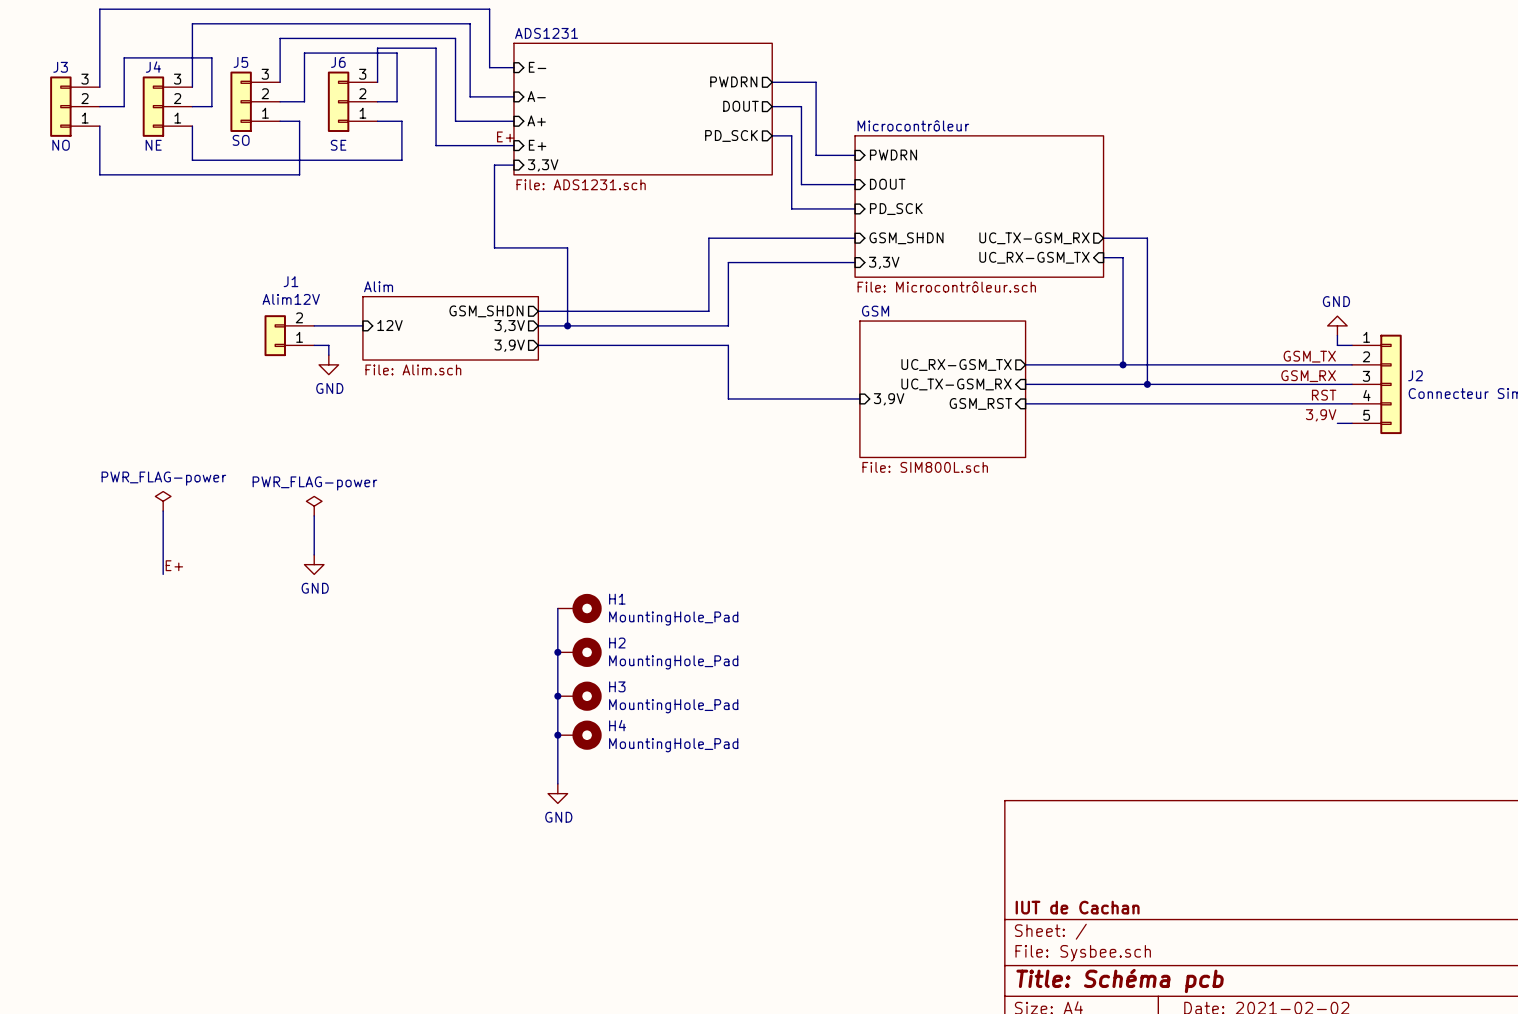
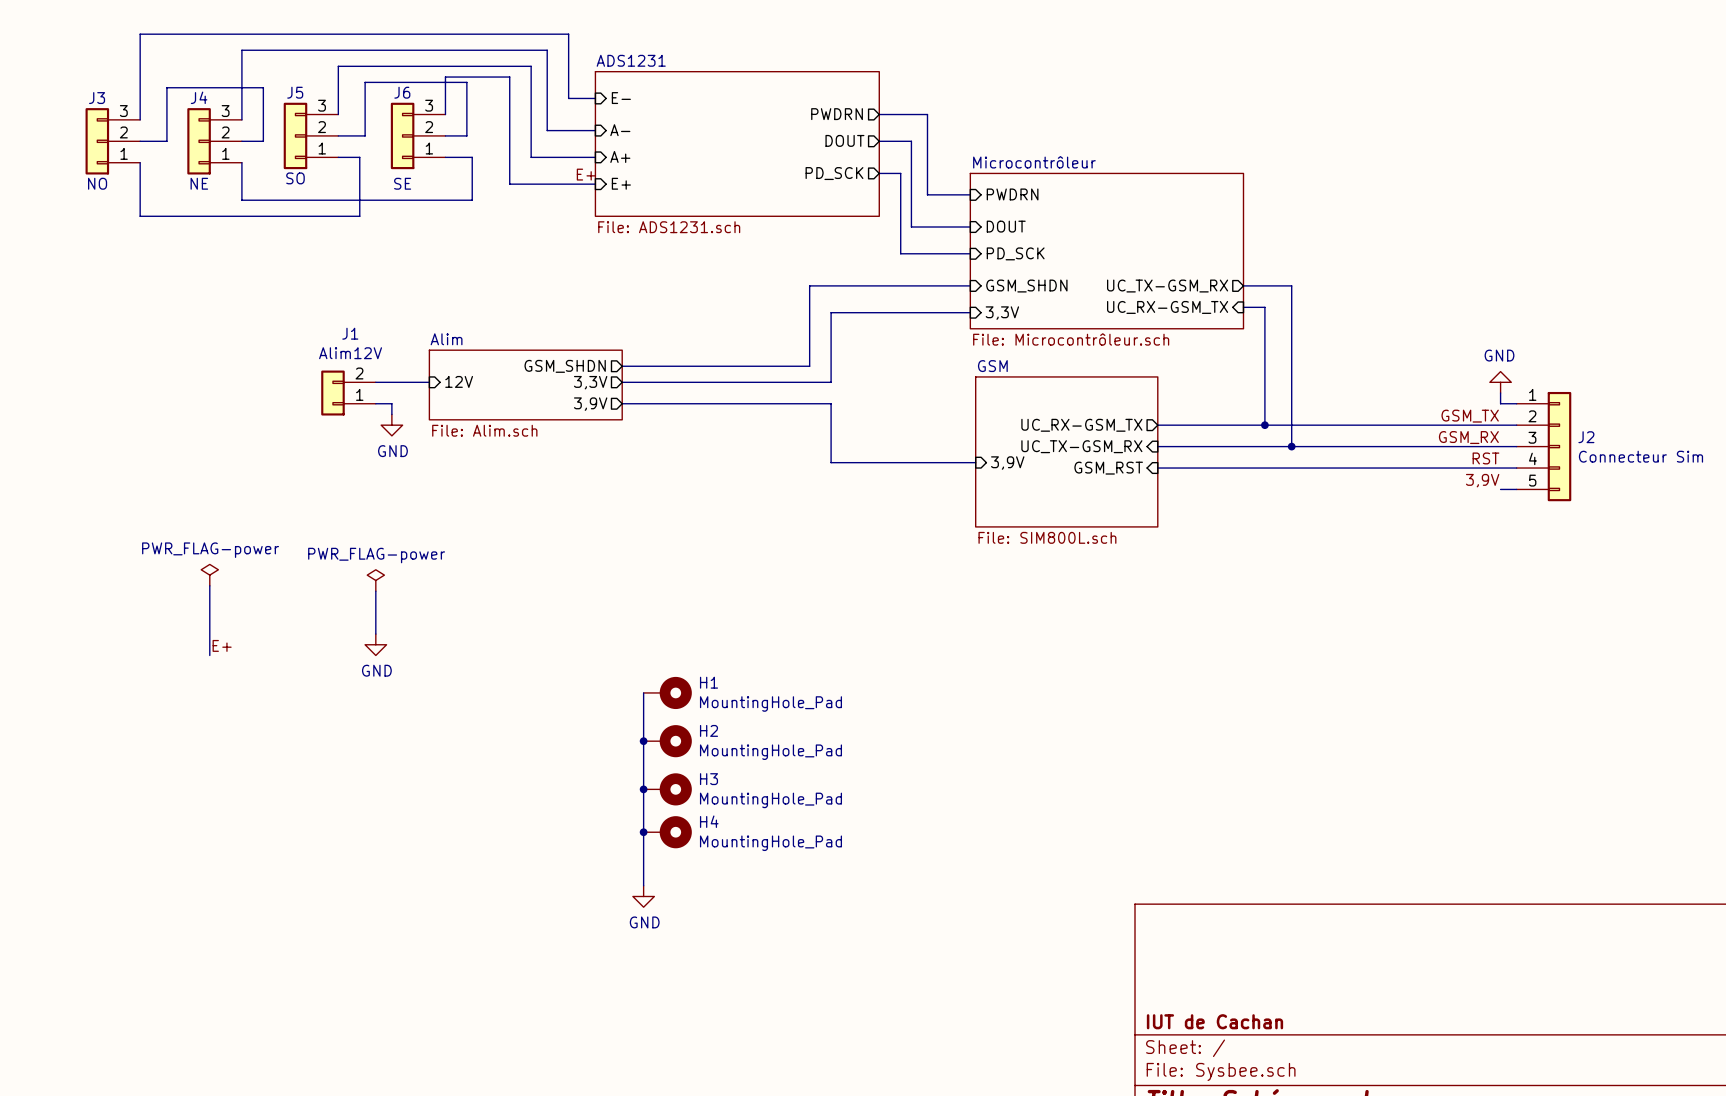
wire: (513, 165) (494, 165) (494, 247) (567, 247) (567, 325) -> none
sheet pin: 3,3V (543, 165) -> none
junction: (567, 325) -> none

